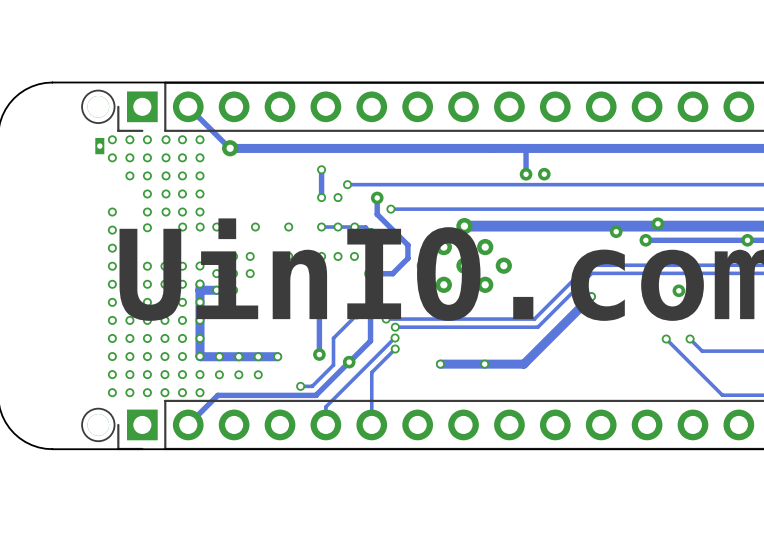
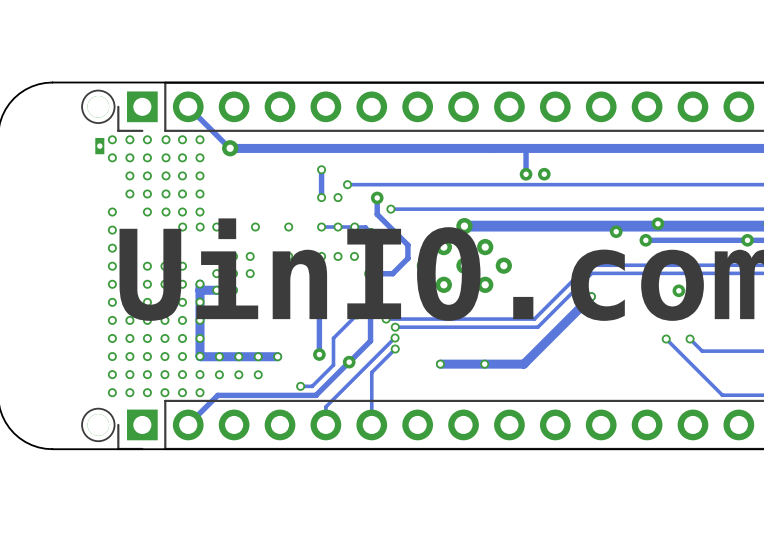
via: none -> (129, 193)
via: (147, 227) -> none
via: (200, 266) -> none

